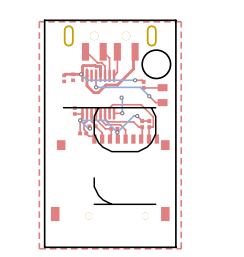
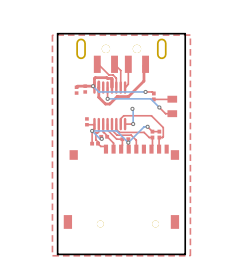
round board edge: [142, 49, 171, 79] -> none
text: rd (109, 156) -> none

